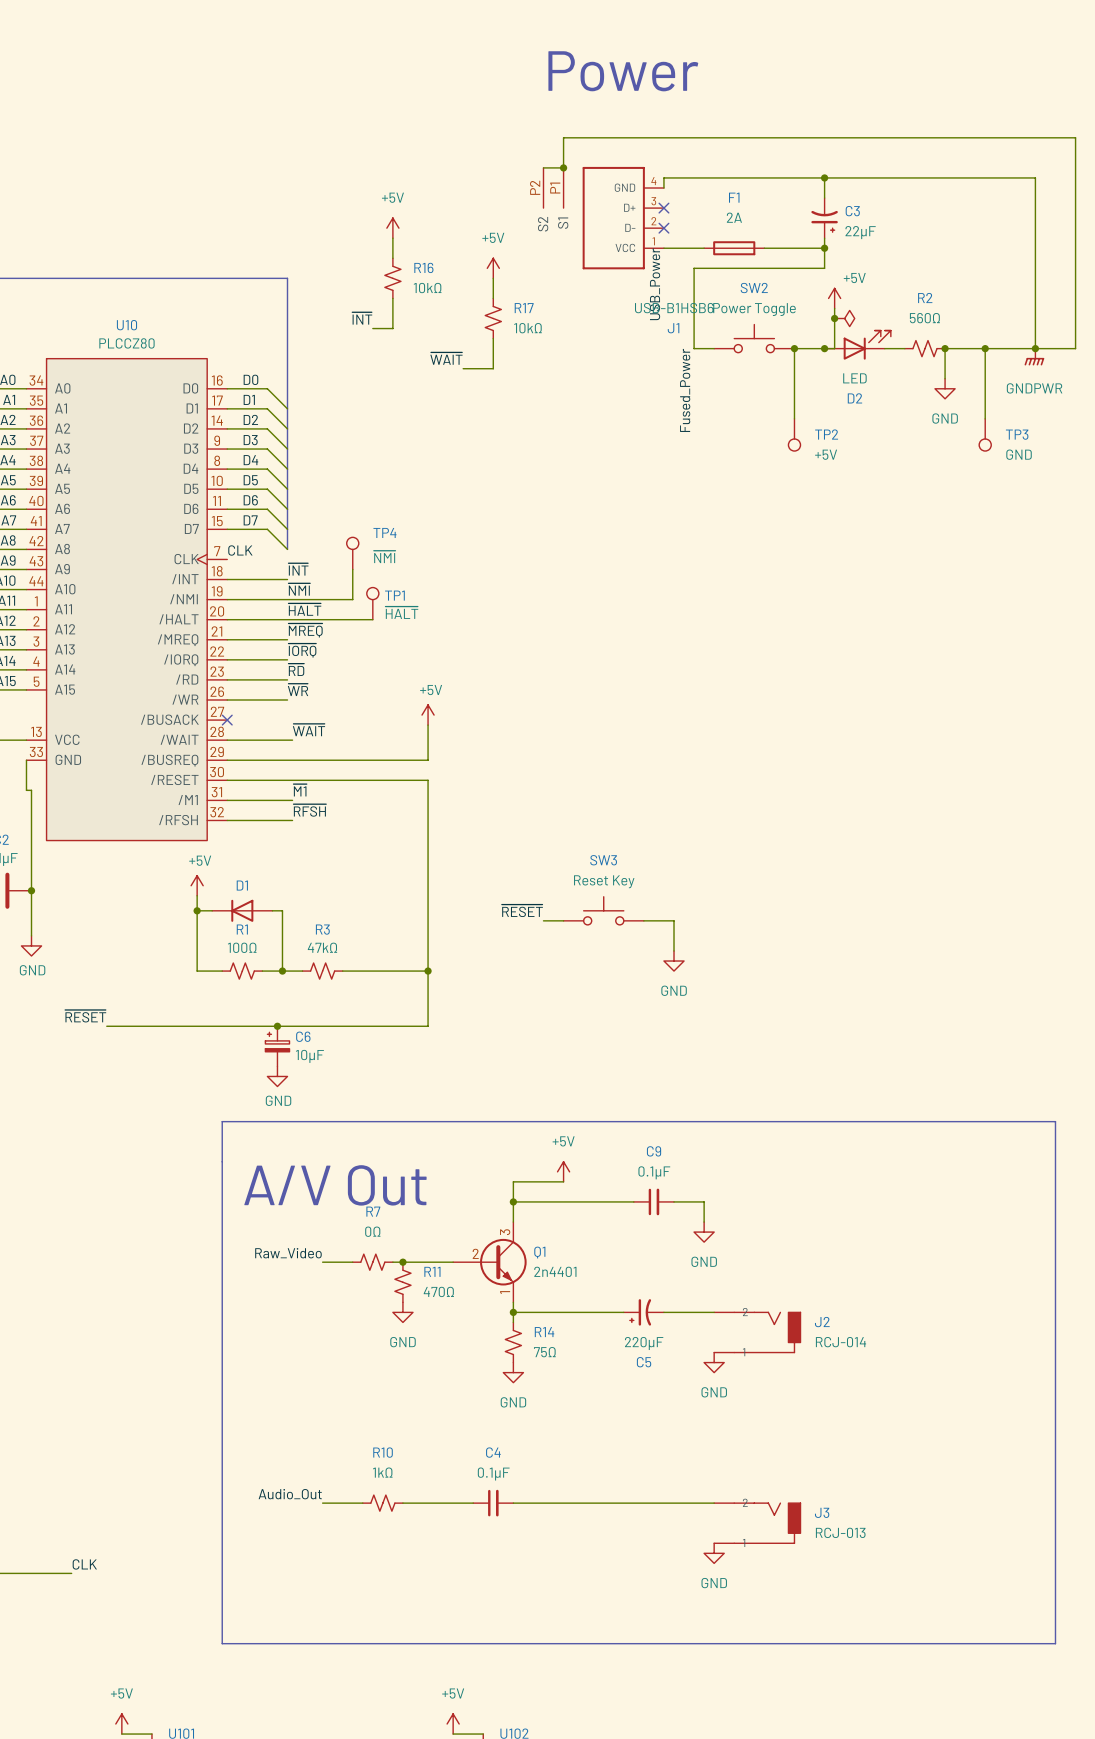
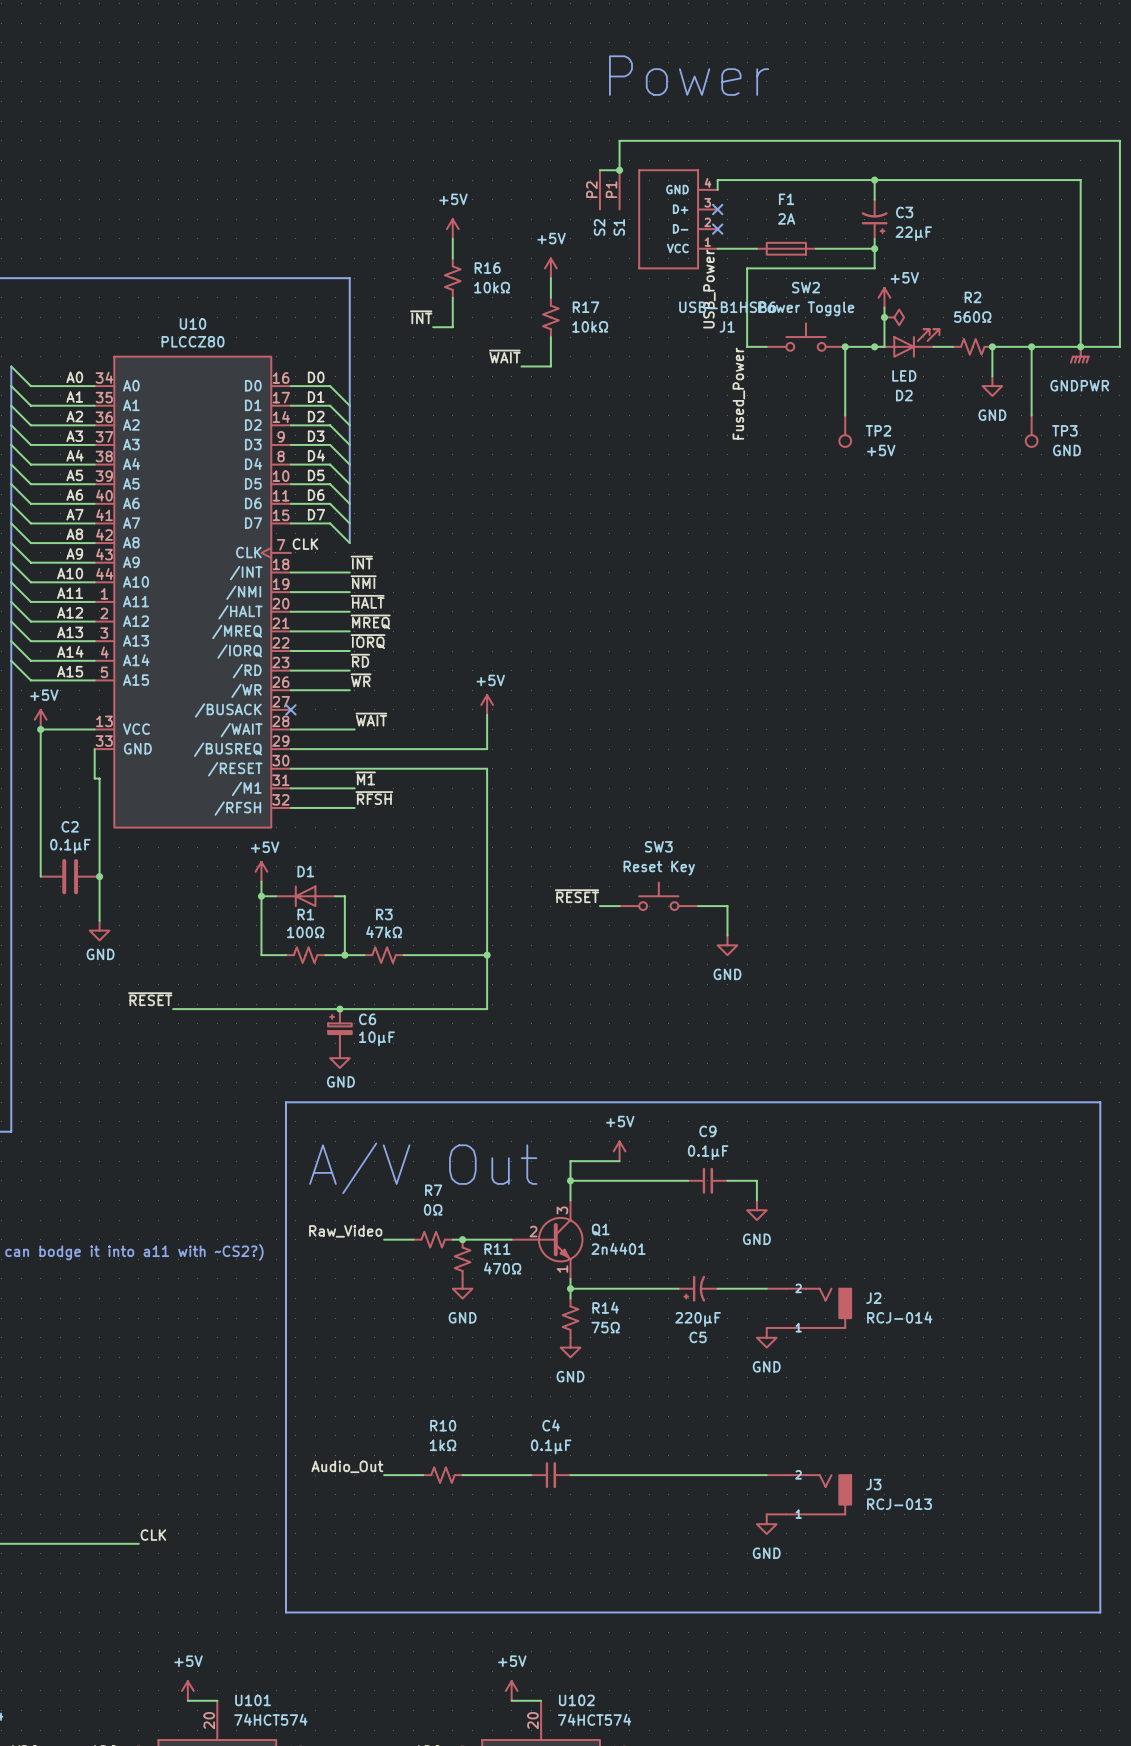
TP4: ~{NMI} (352, 553) -> none
wire: (352, 569) (352, 599) (287, 599) -> none
TP1: ~{HALT} (372, 603) -> none
wire: (287, 619) (372, 619) -> none

